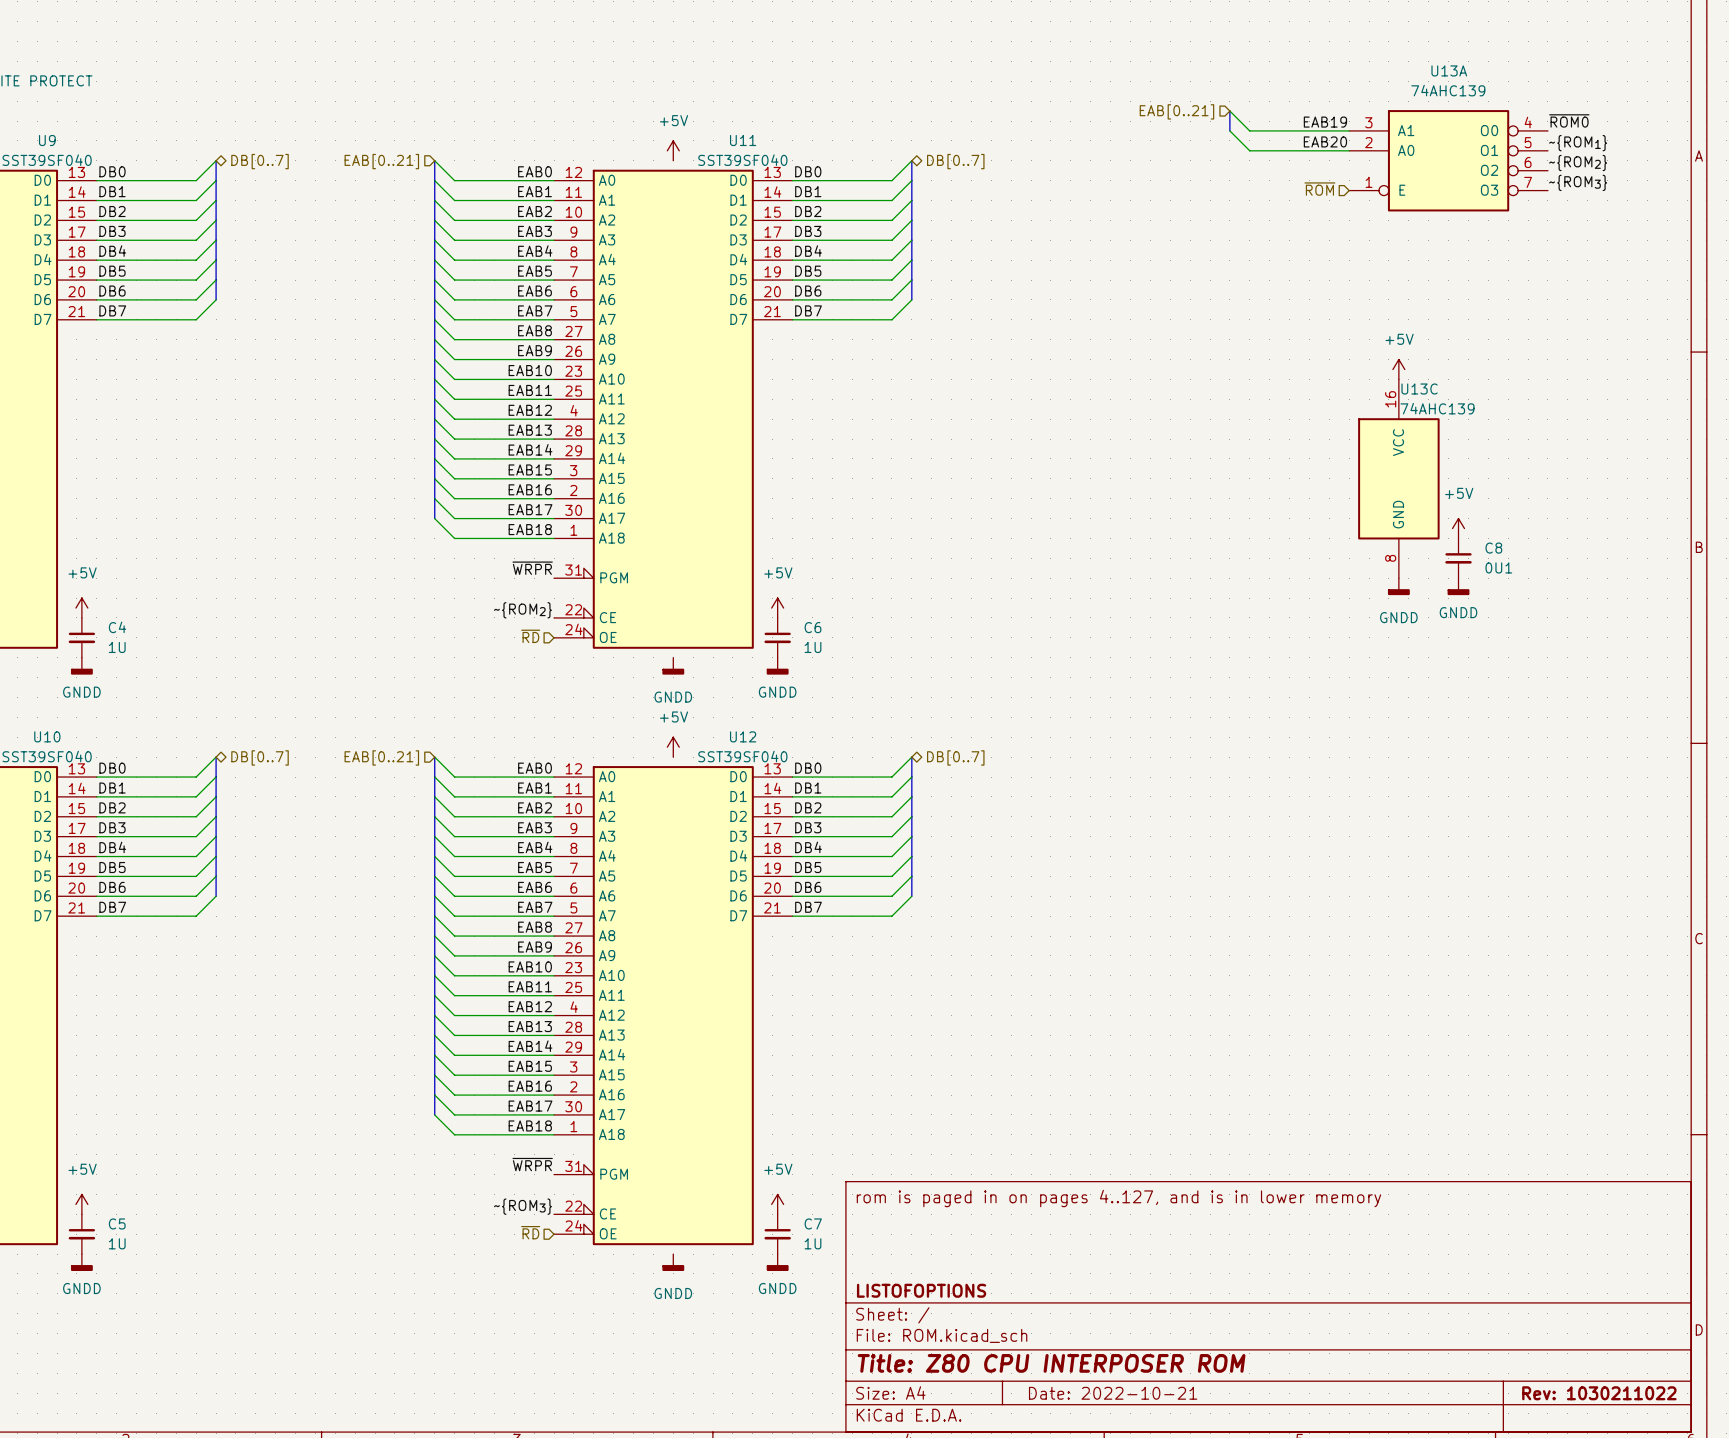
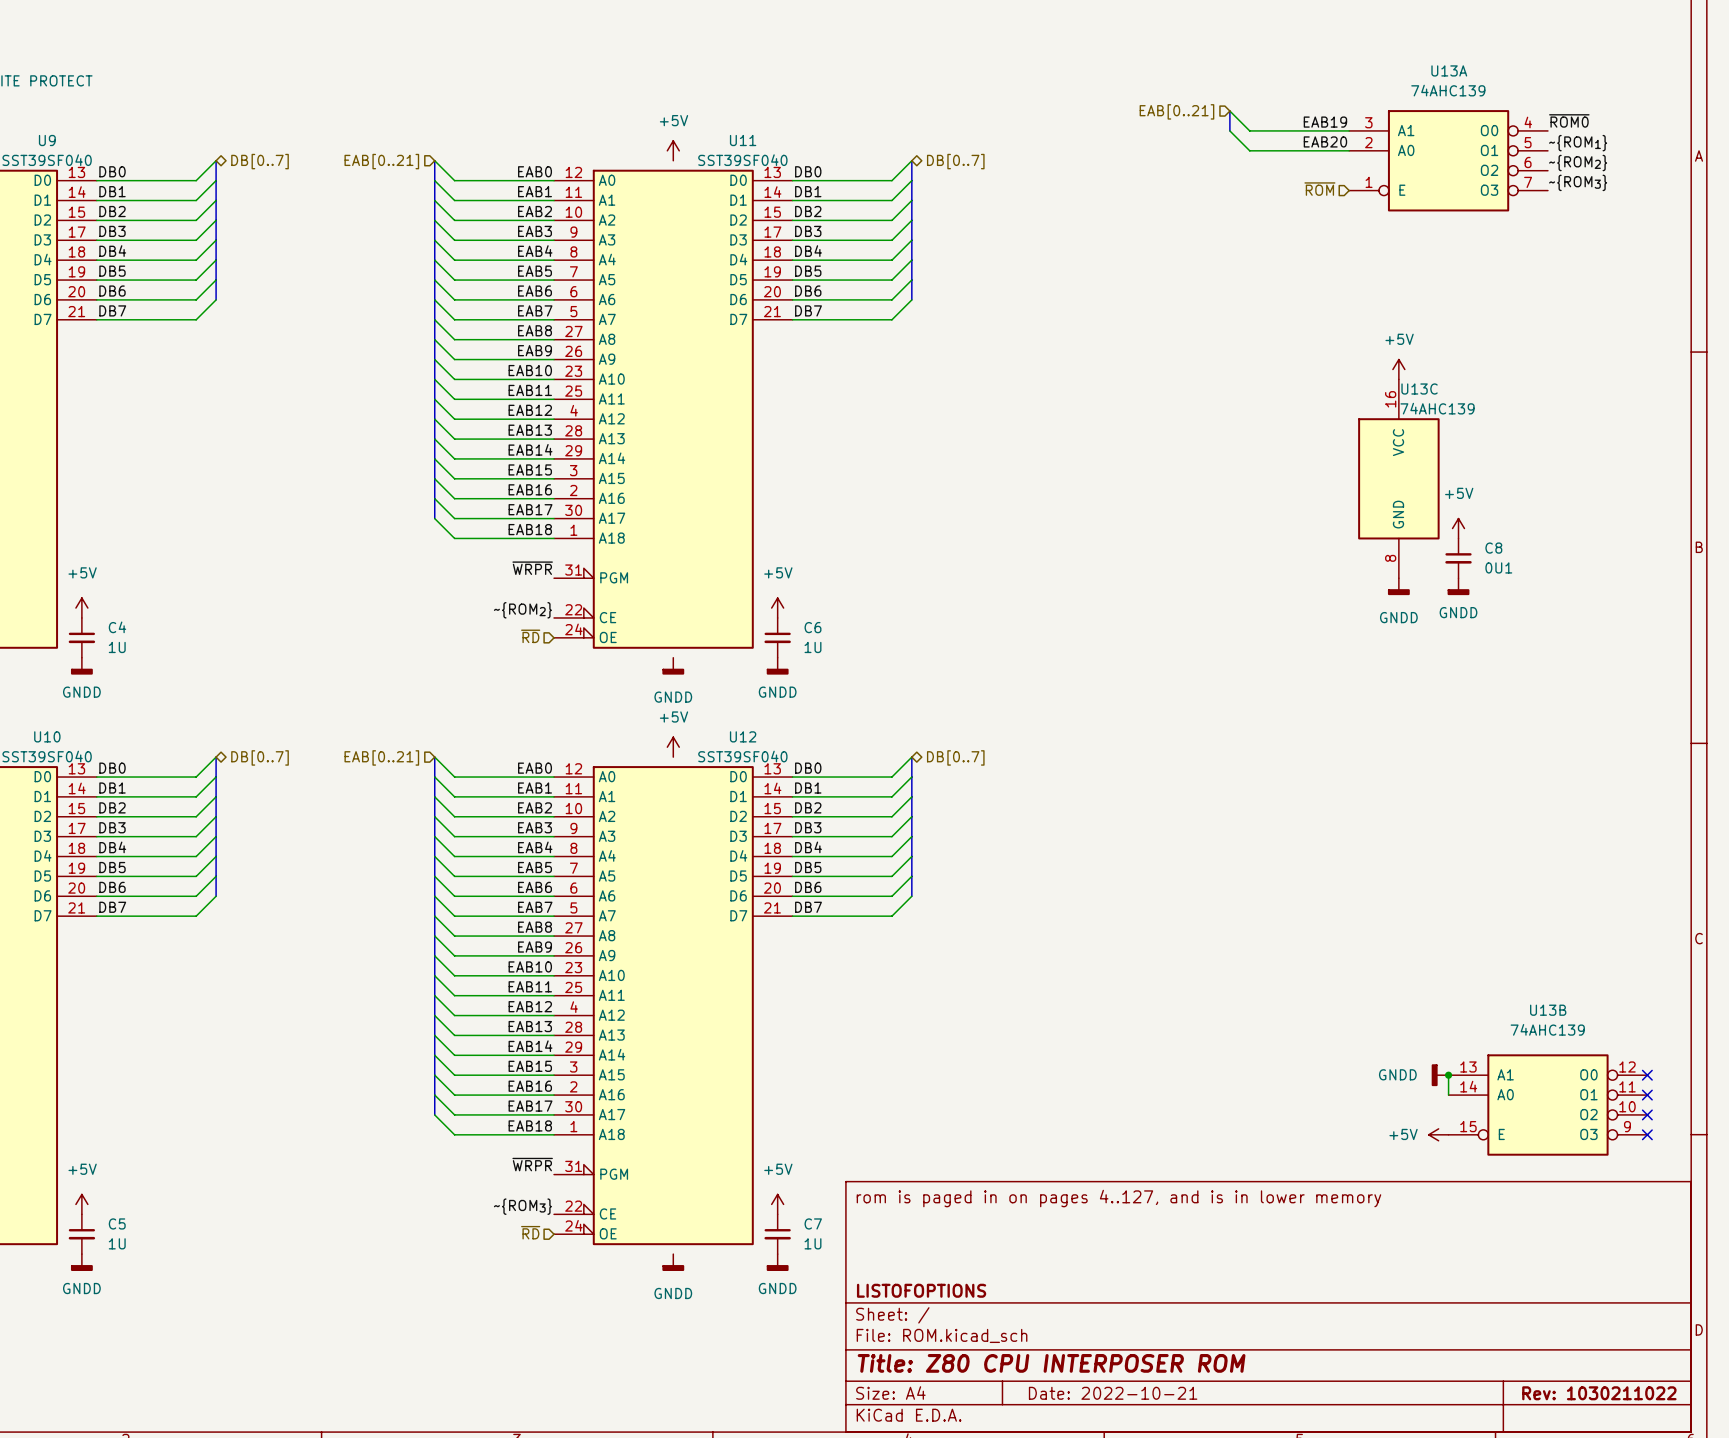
power symbol: none -> GNDD (1440, 1075)
wire: none -> (1448, 1075) (1448, 1095)
junction: none -> (1448, 1075)
no-connect mark: none -> (1647, 1075)
no-connect mark: none -> (1647, 1095)
U13B: none -> 74AHC139 (1547, 1105)
no-connect mark: none -> (1647, 1114)
power symbol: none -> +5V (1438, 1134)
no-connect mark: none -> (1647, 1134)

